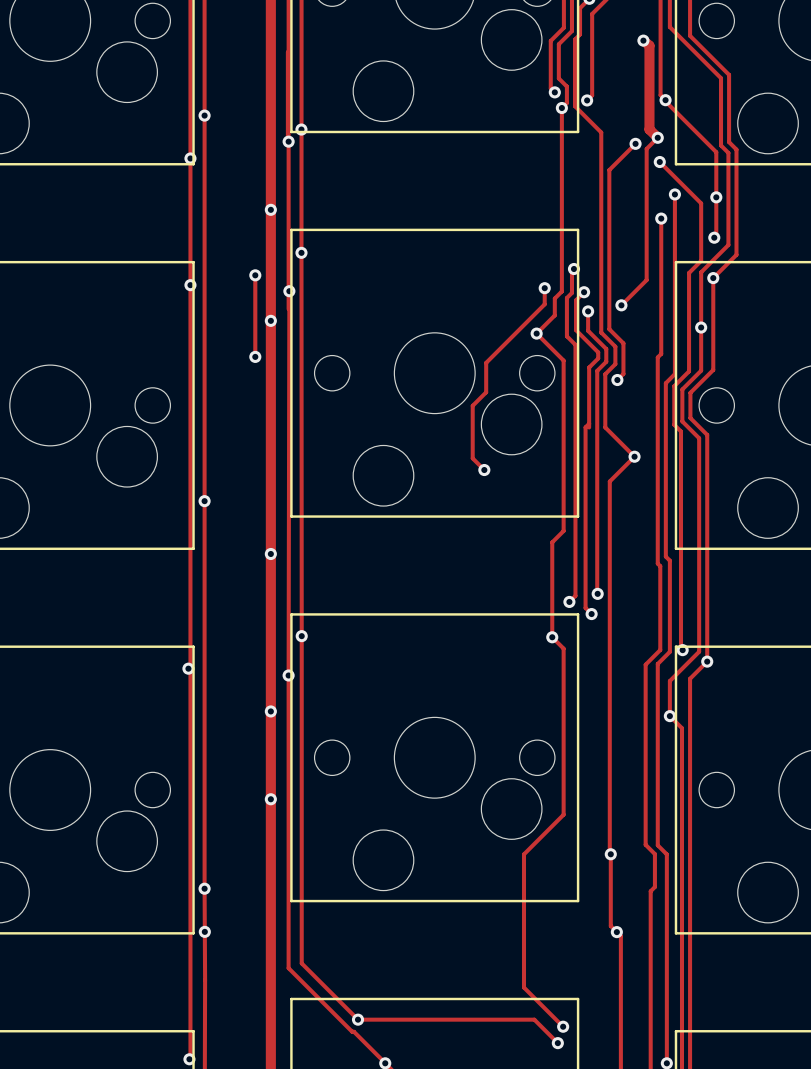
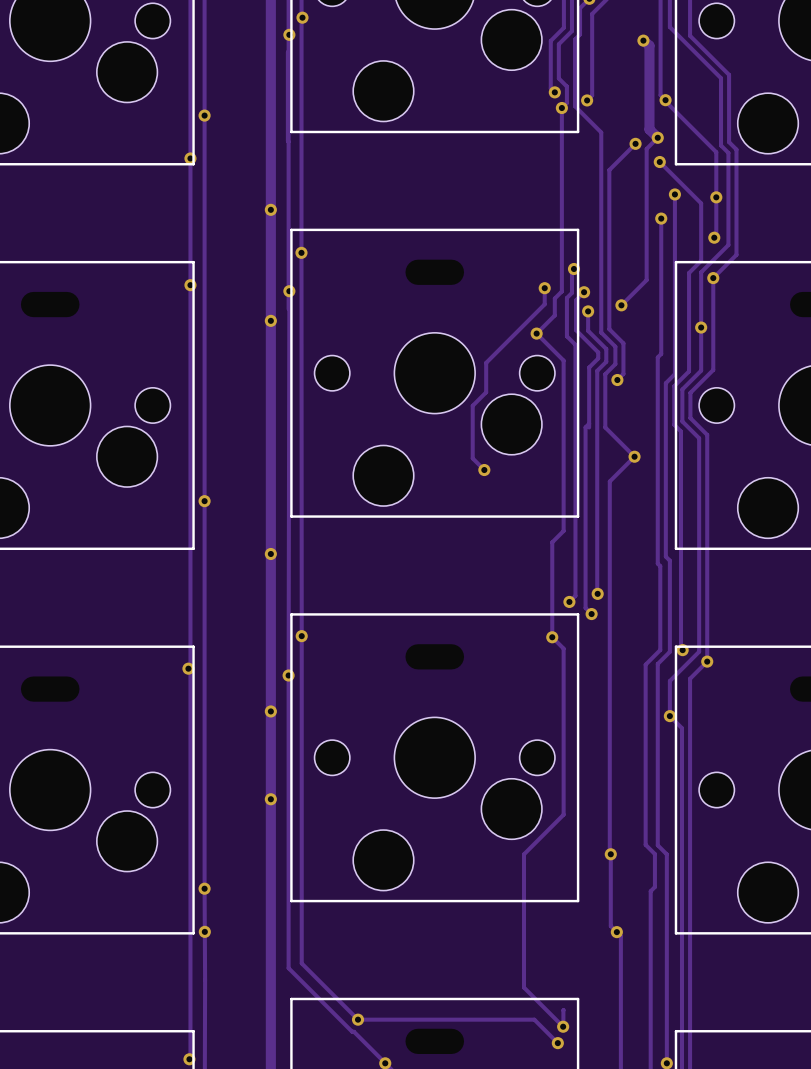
via: none -> (302, 17)
via: none -> (289, 34)
via: (301, 129) -> none
via: (288, 141) -> none
track: (255, 275) (255, 356) -> none
via: (255, 275) -> none
via: (255, 356) -> none
track: none -> (563, 1010) (563, 1026)

